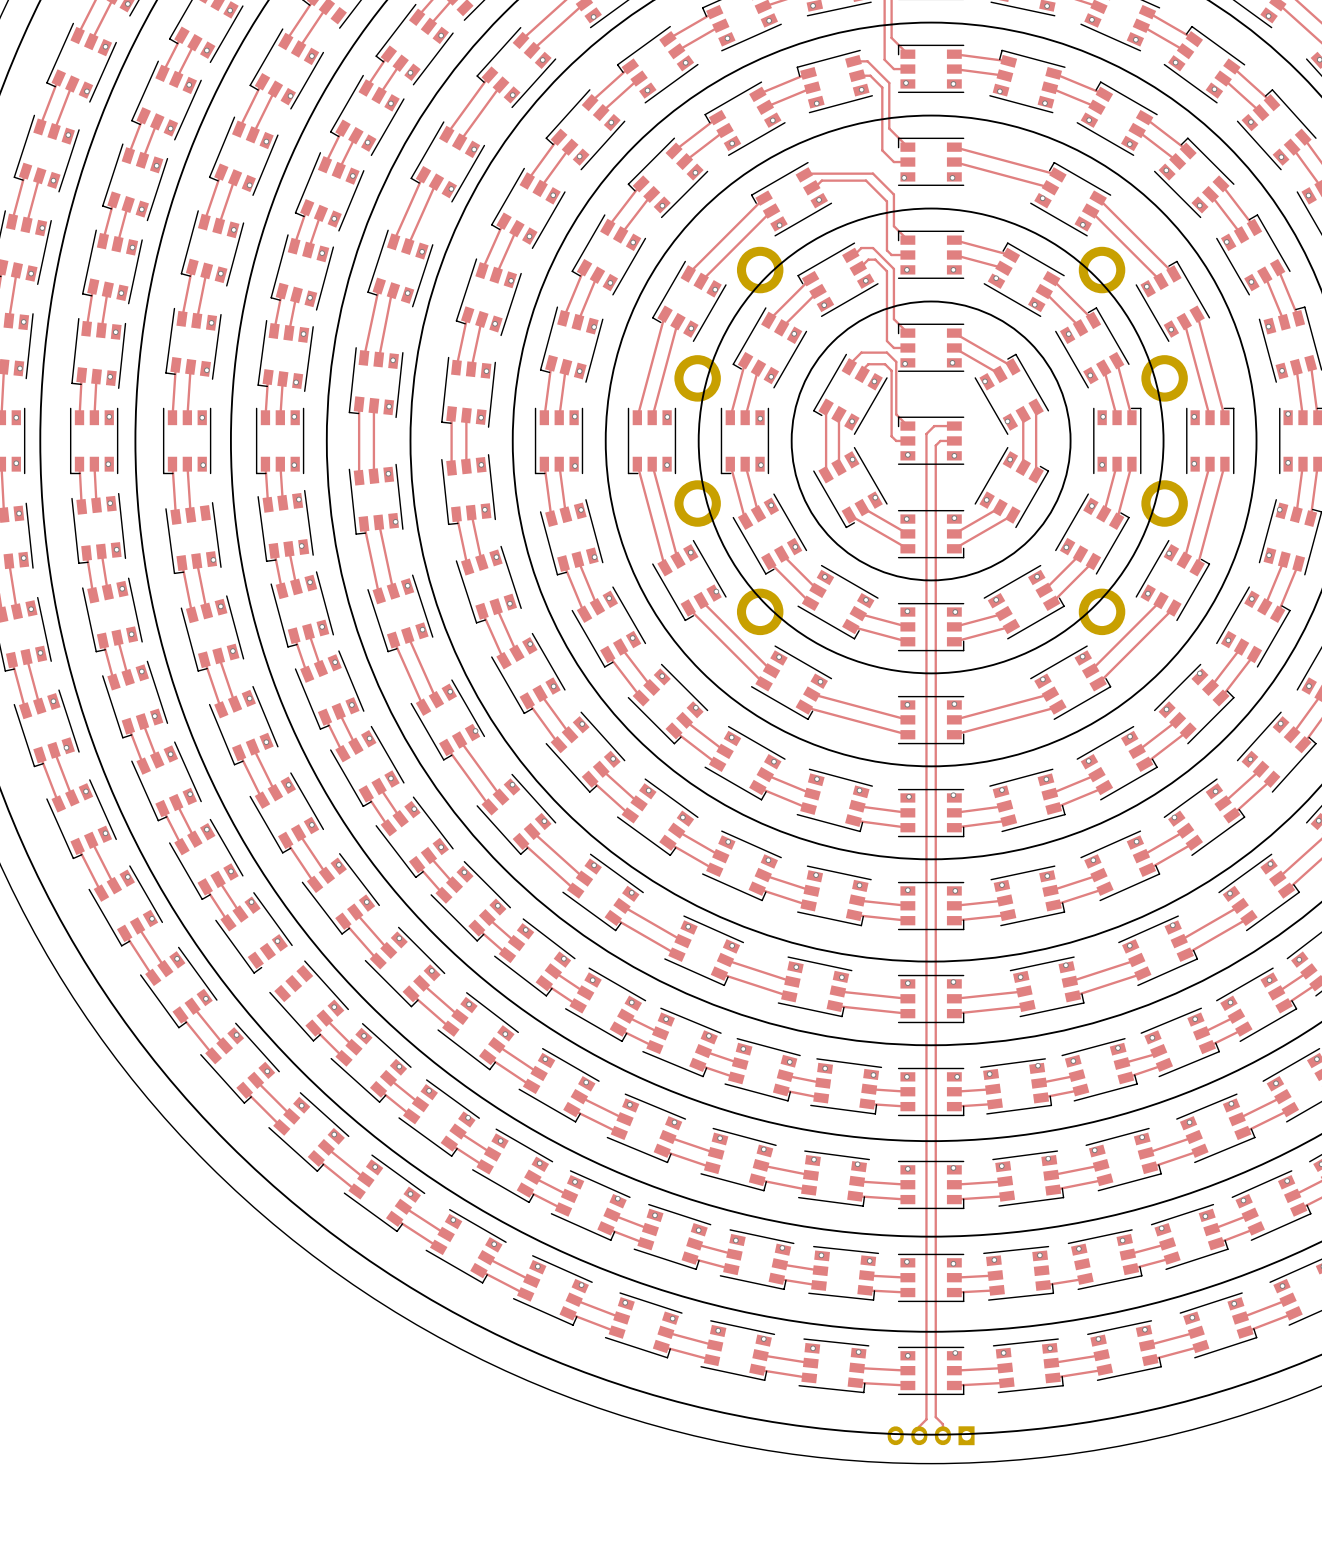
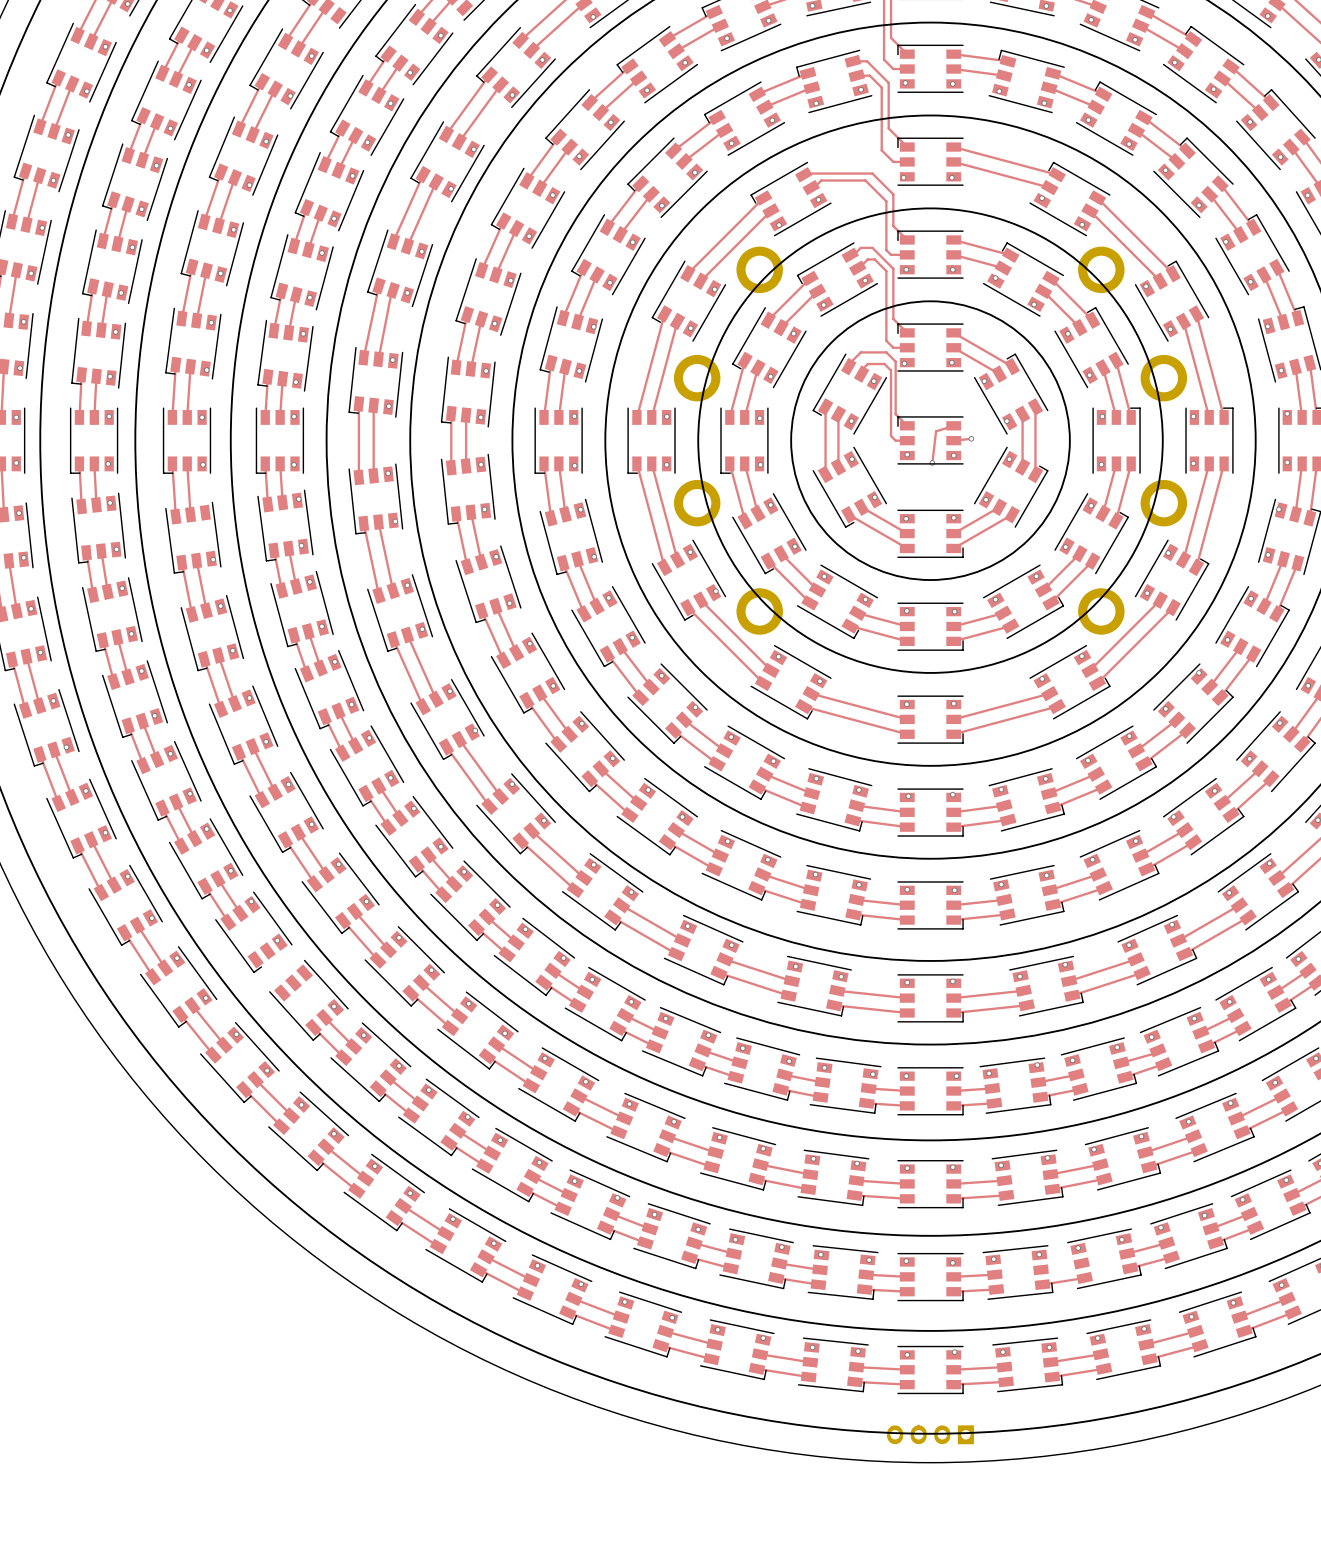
track: (954, 426) (934, 426) (926, 433) (926, 1419) (919, 1426) -> (953, 425) (936, 431) (932, 462)
via: none -> (971, 438)
track: (954, 440) (940, 440) (935, 445) (935, 1417) (942, 1424) (942, 1435) -> (953, 440) (971, 438)
via: none -> (932, 462)

